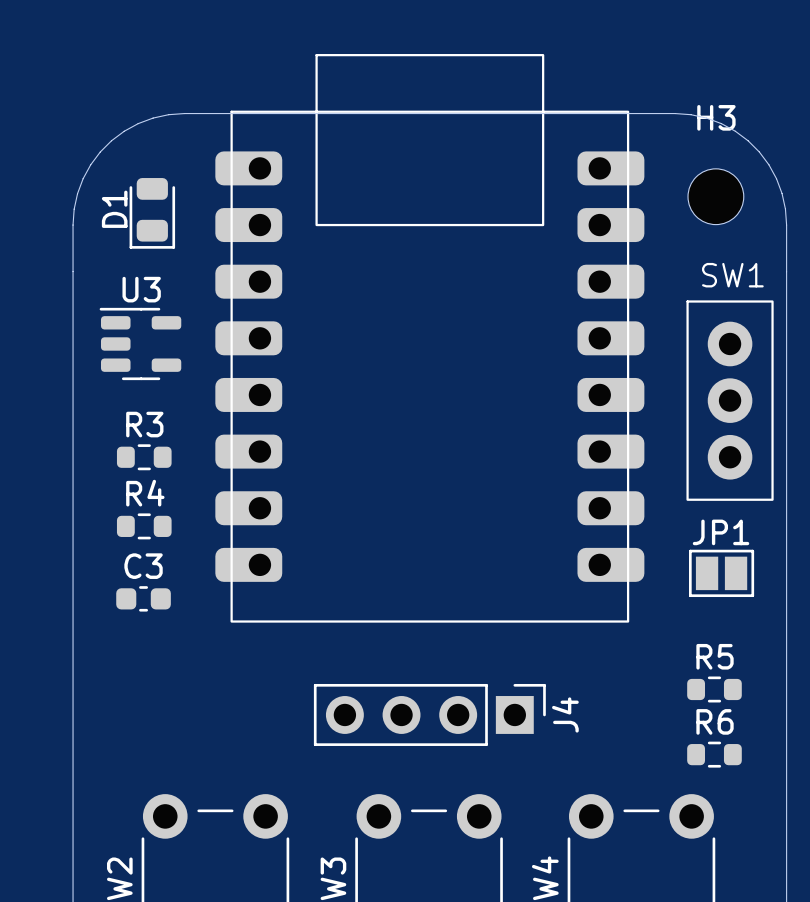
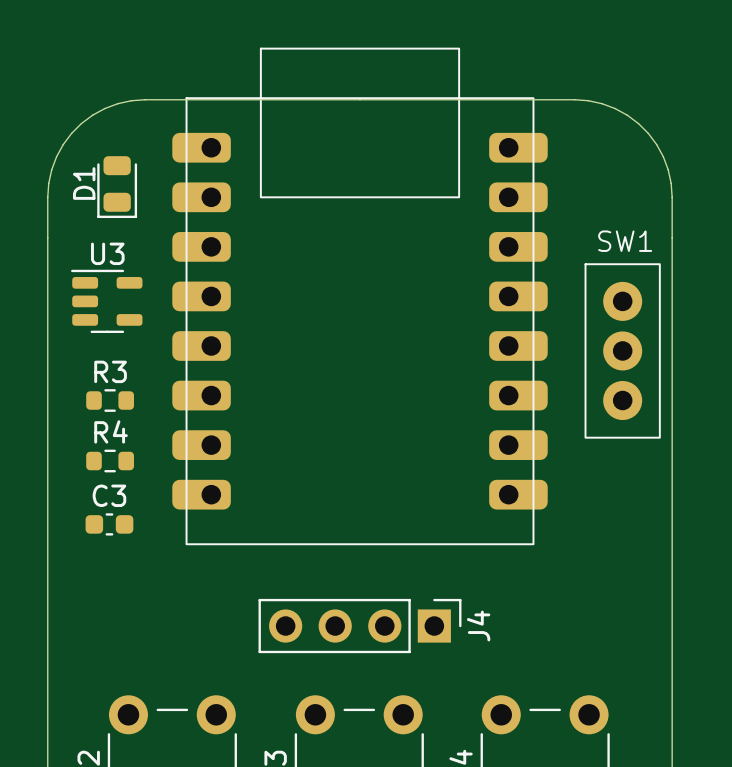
H3: (715, 196) -> none
JP1: (721, 573) -> none
R5: (714, 689) -> none
R6: (714, 754) -> none

